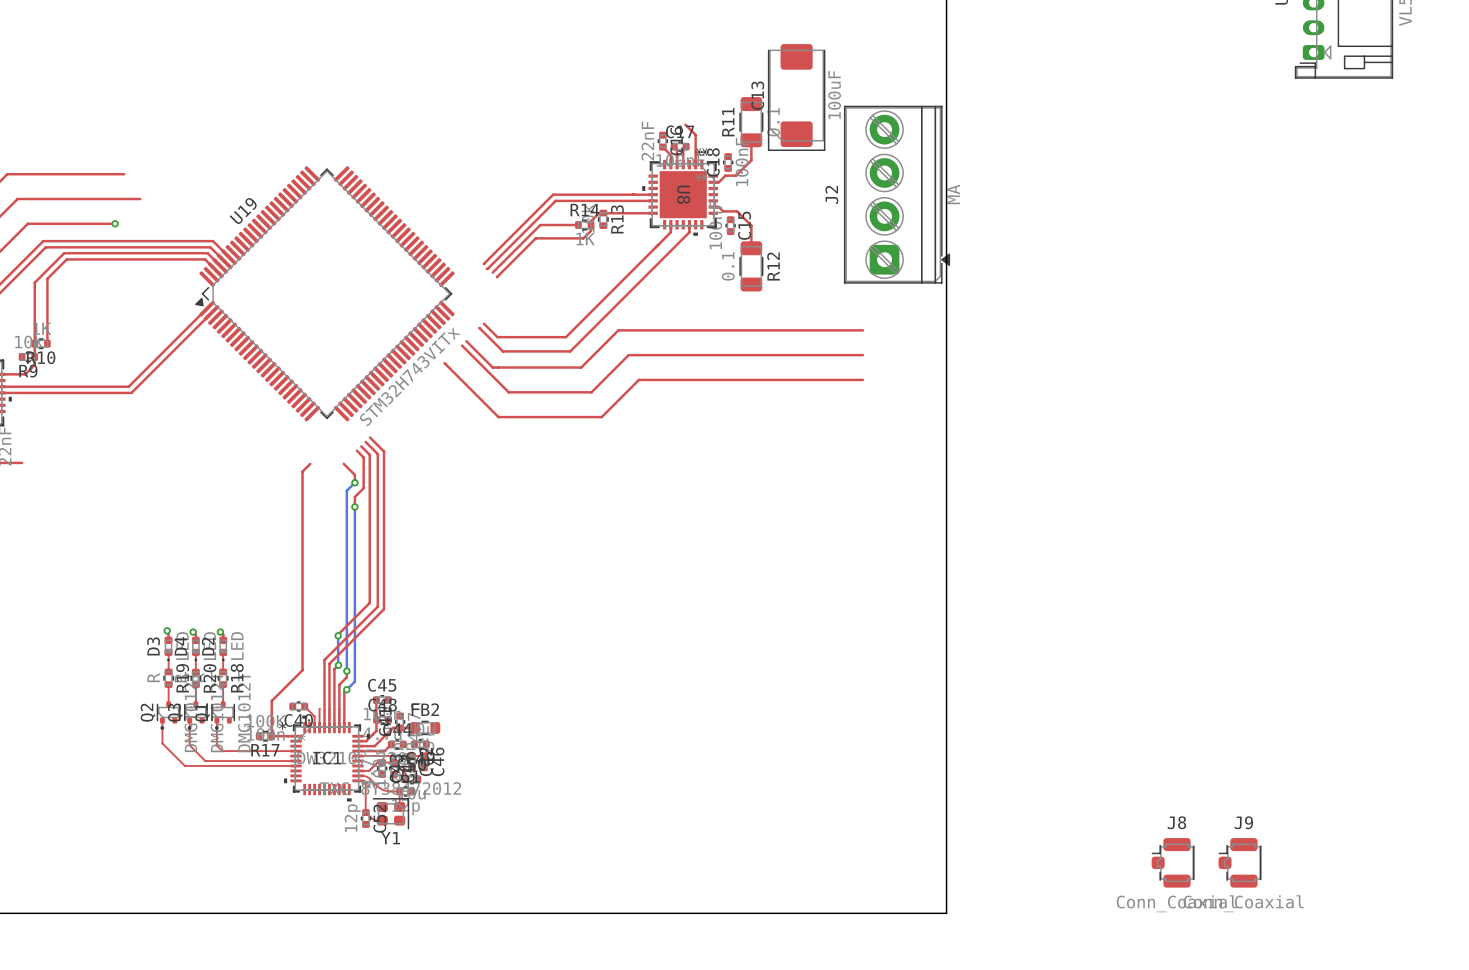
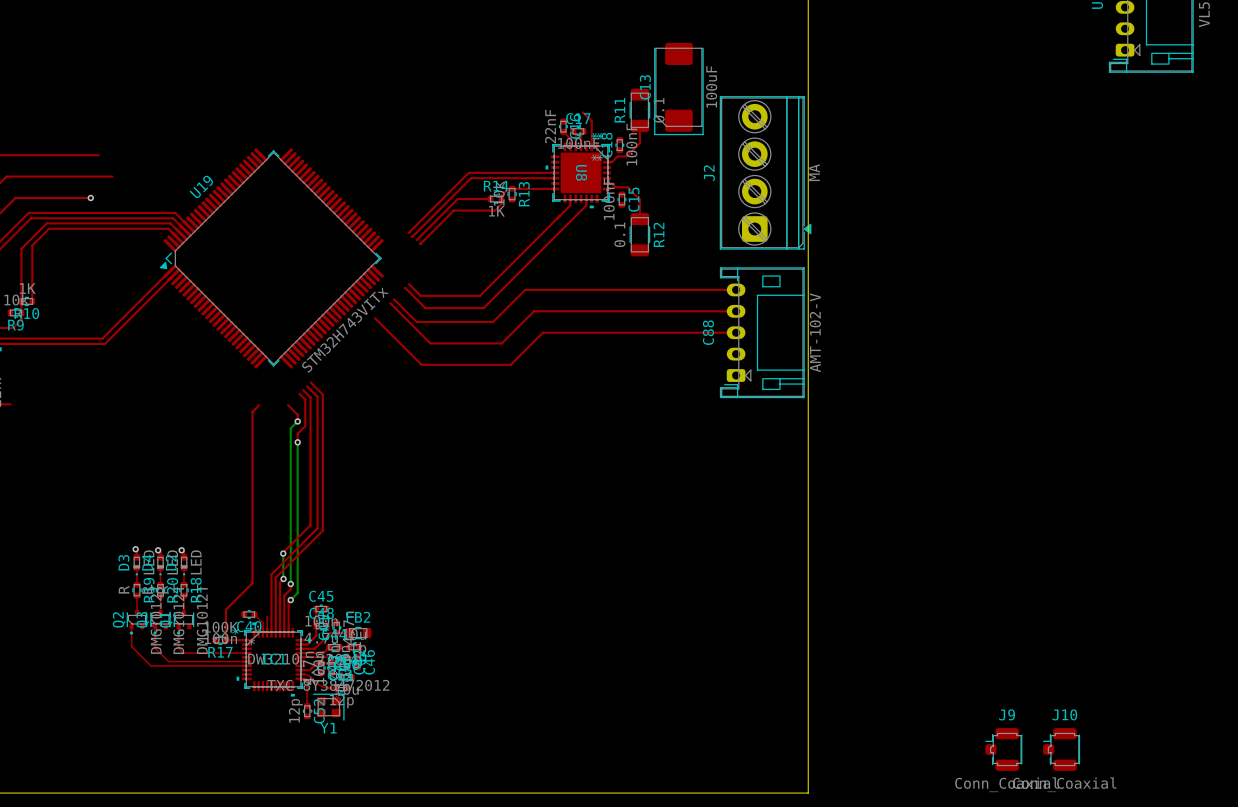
C88: none -> AMT-102-V (762, 332)
J8 name: J8 (1176, 822) -> J9 (1007, 714)
J9 name: J9 (1243, 822) -> J10 (1064, 714)

